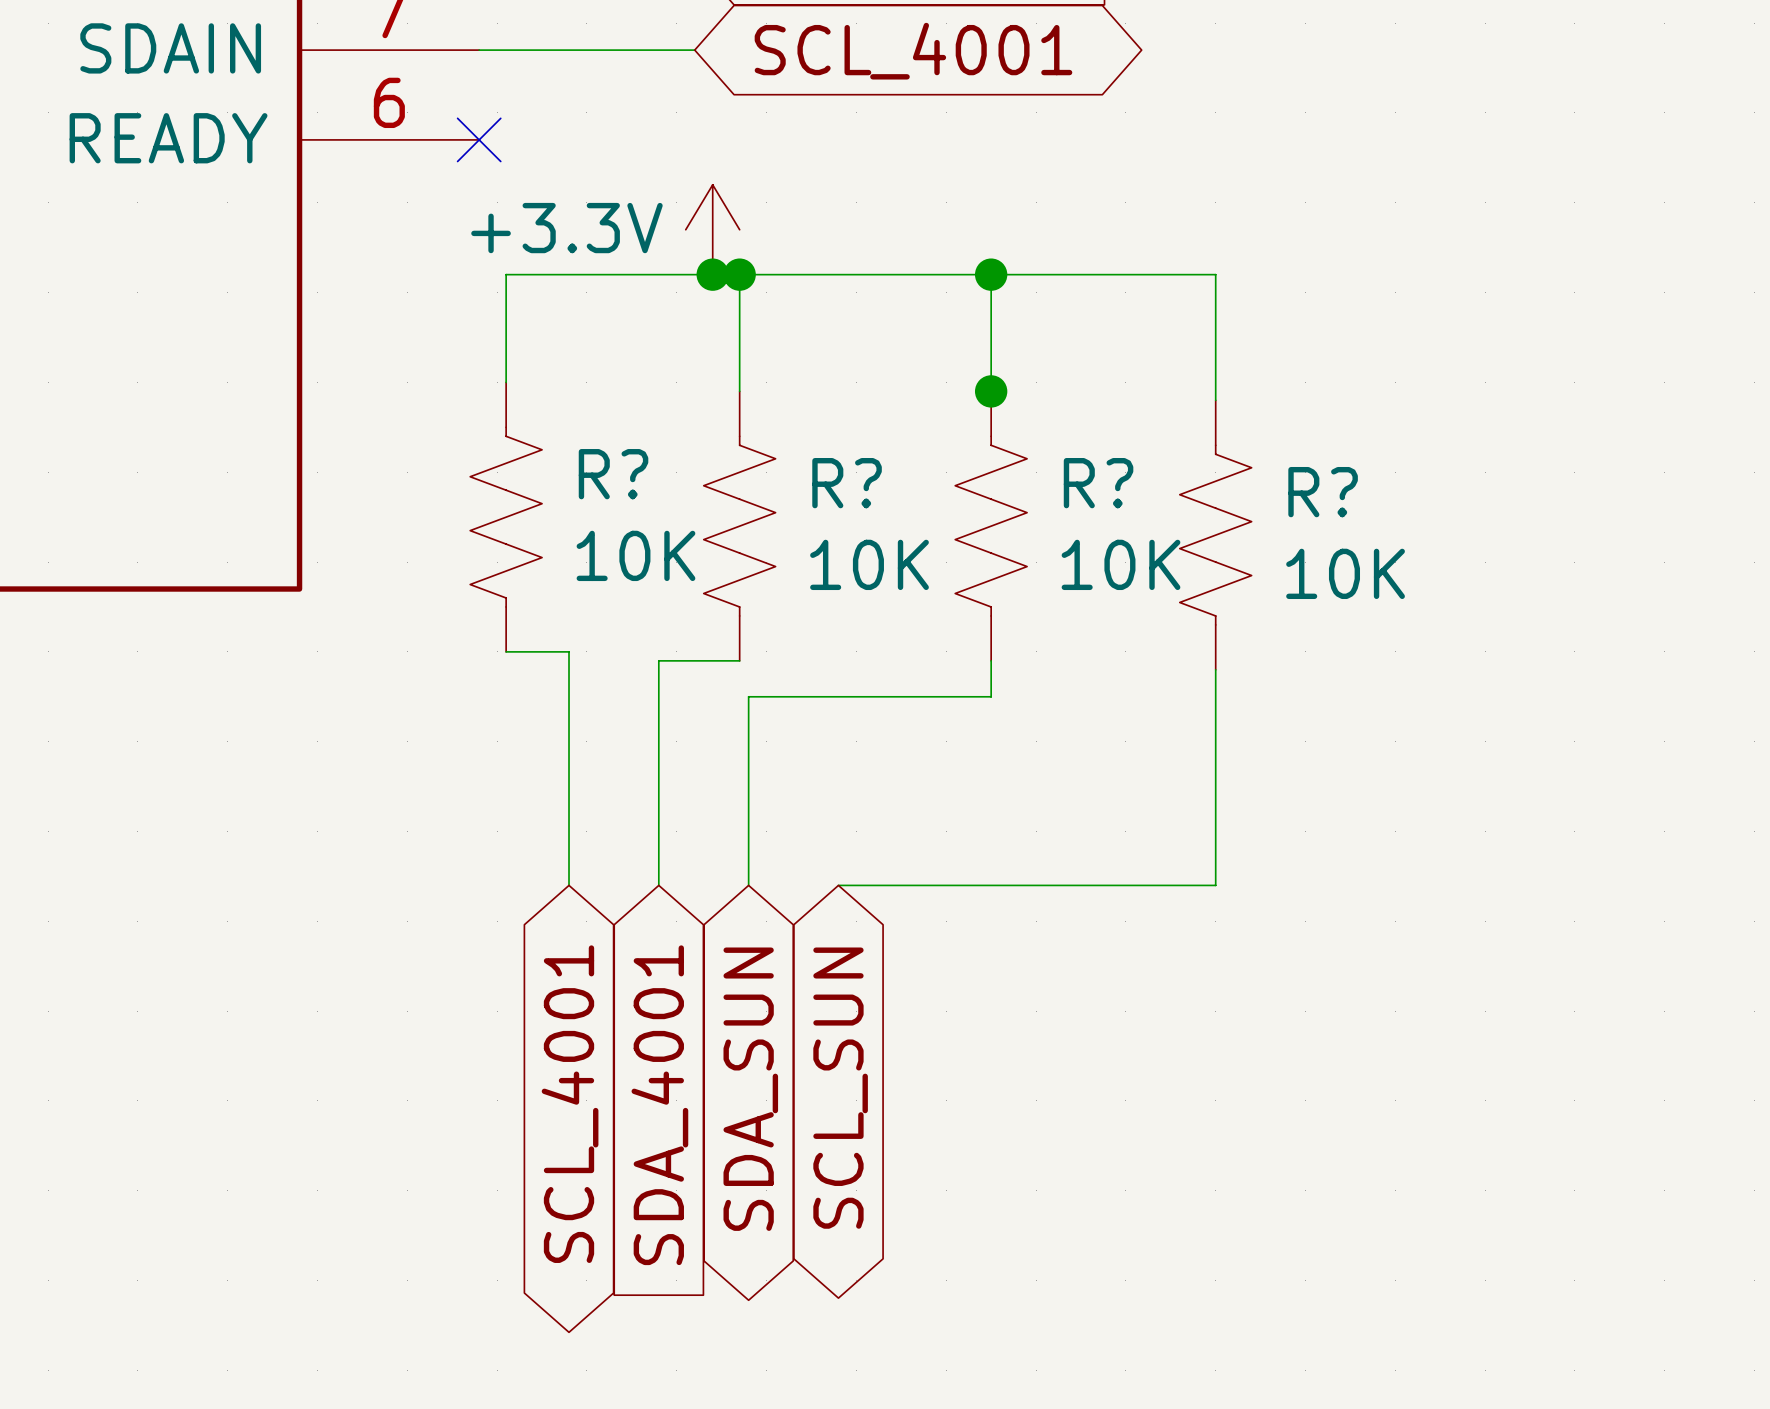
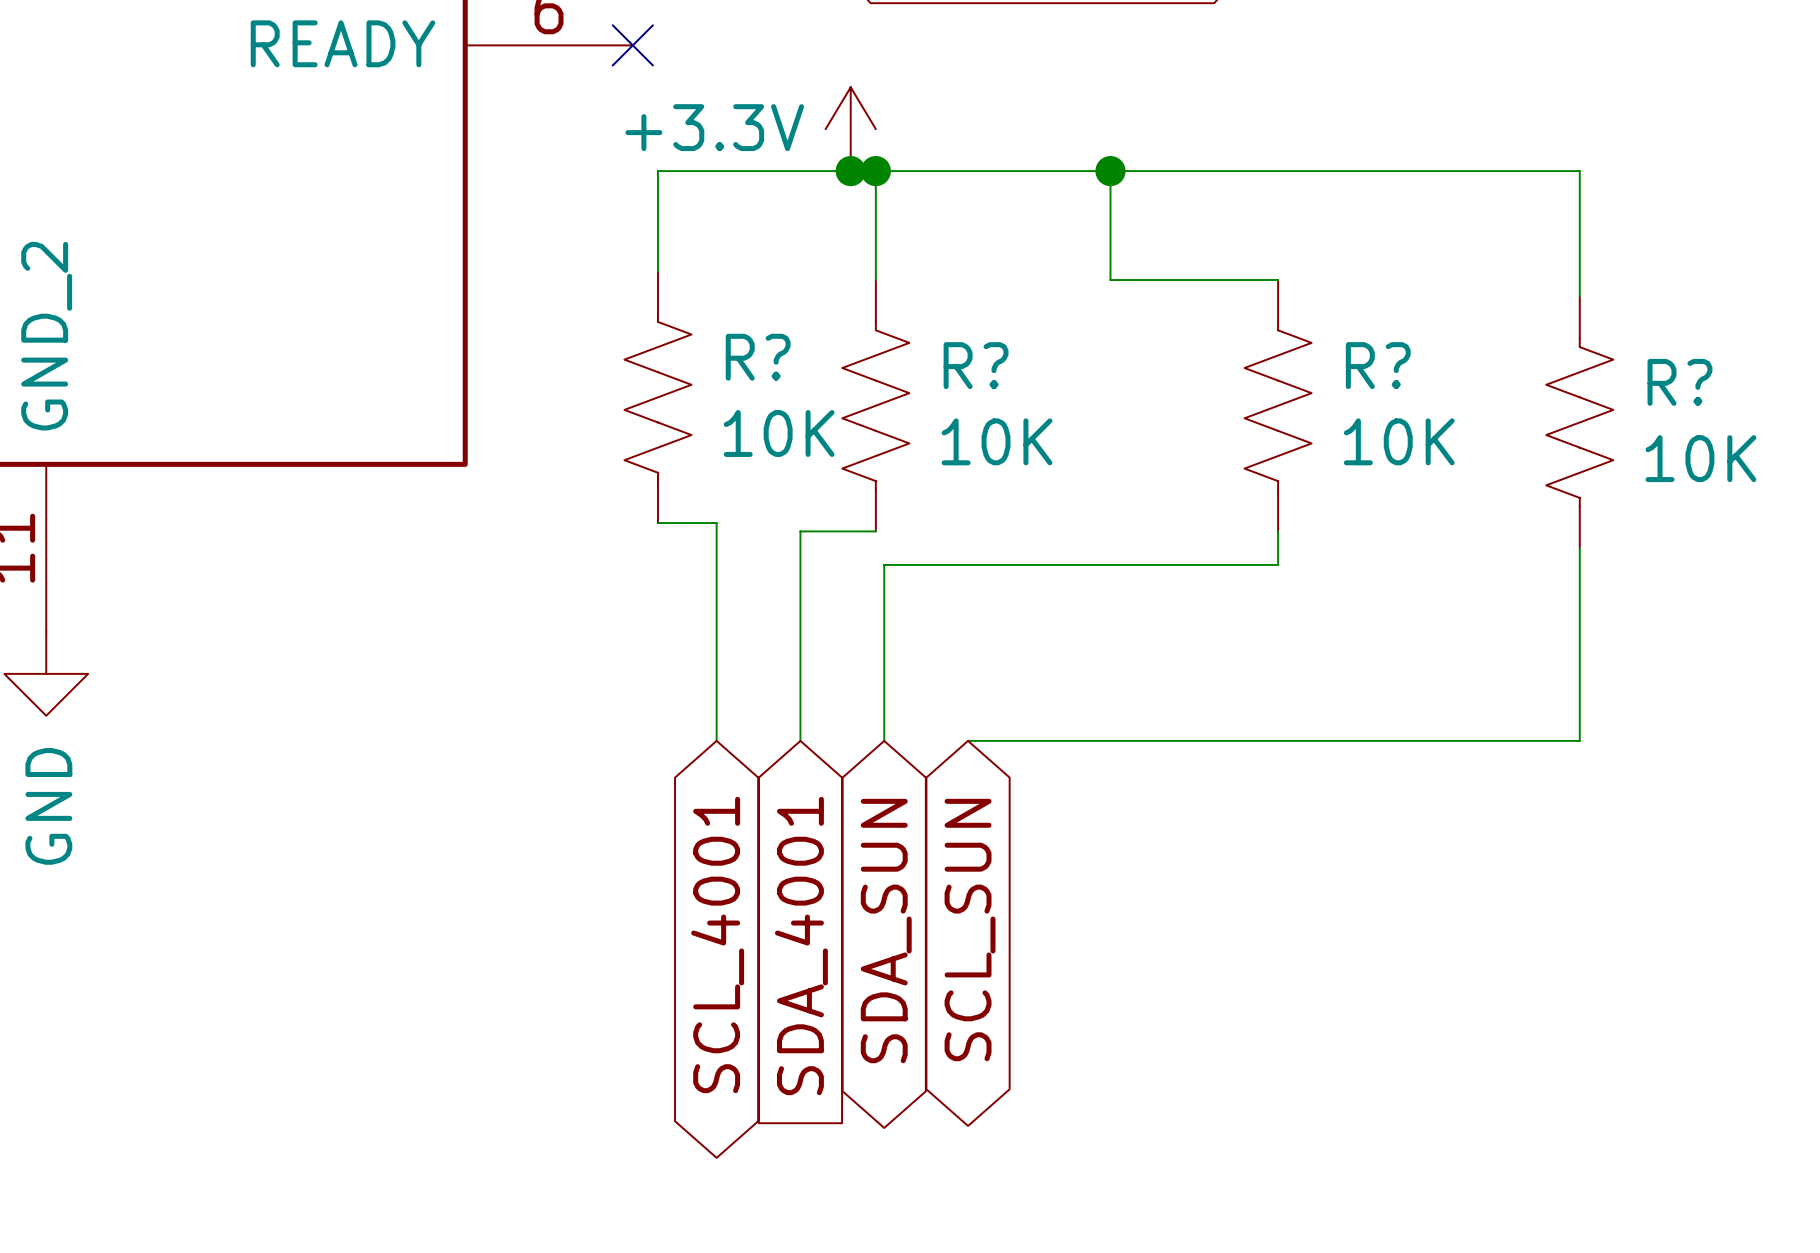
wire: (1215, 274) (1215, 400) -> (1319, 171) (1579, 171) (1579, 296)
junction: (991, 391) -> none
wire: none -> (1118, 280) (1278, 280)
R?: 10K (991, 526) -> none
R? position: (1215, 535) -> (1278, 405)
R?: none -> 10K (1579, 422)
wire: (991, 660) (991, 696) -> (1278, 531) (1278, 564) (1110, 564)
wire: (1215, 669) (1215, 885) -> (1579, 548) (1579, 740) (1319, 740)

